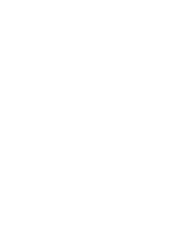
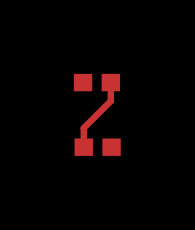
part: none -> (96, 82)
top track: none -> (110, 82) (110, 101) (83, 128) (83, 147)
part: none -> (97, 147)

